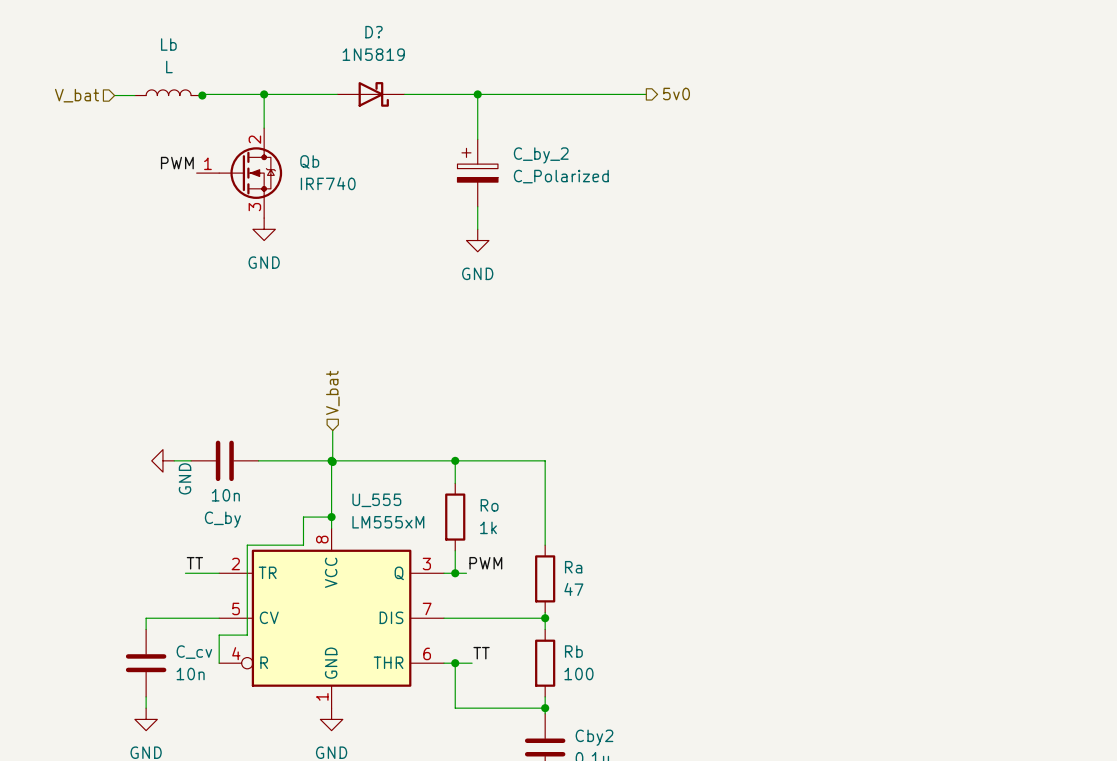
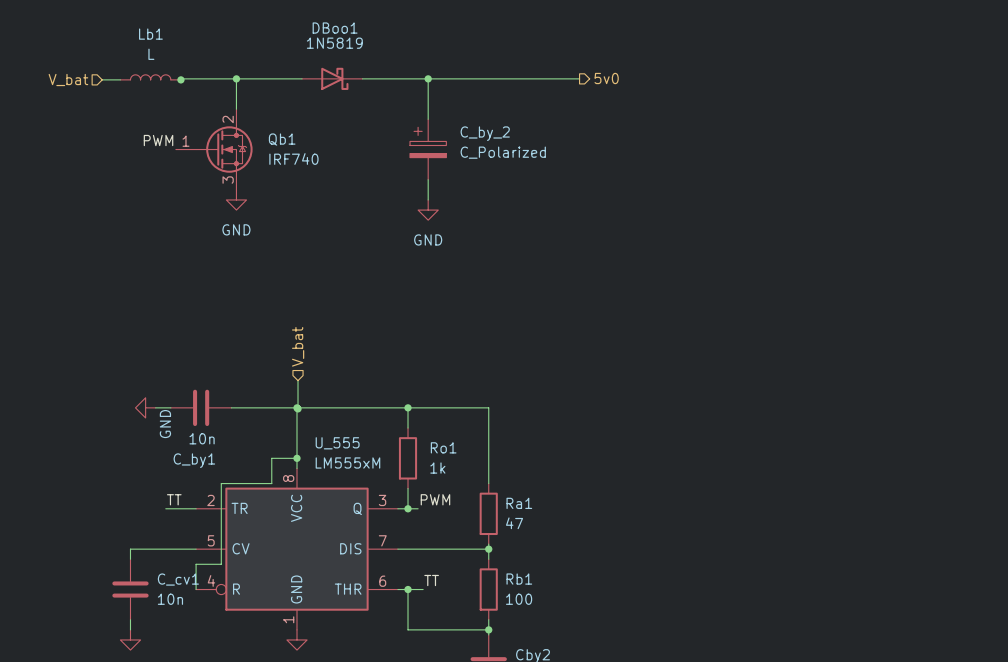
D? name: D? (374, 32) -> DBoo1 (335, 28)
Lb name: Lb (168, 44) -> Lb1 (150, 34)
Qb name: Qb (309, 161) -> Qb1 (282, 139)
Ro name: Ro (489, 505) -> Ro1 (443, 447)
C_by name: C_by (222, 519) -> C_by1 (194, 460)
Ra name: Ra (573, 567) -> Ra1 (519, 503)
Rb name: Rb (573, 651) -> Rb1 (519, 579)
C_cv name: C_cv (194, 652) -> C_cv1 (178, 579)

